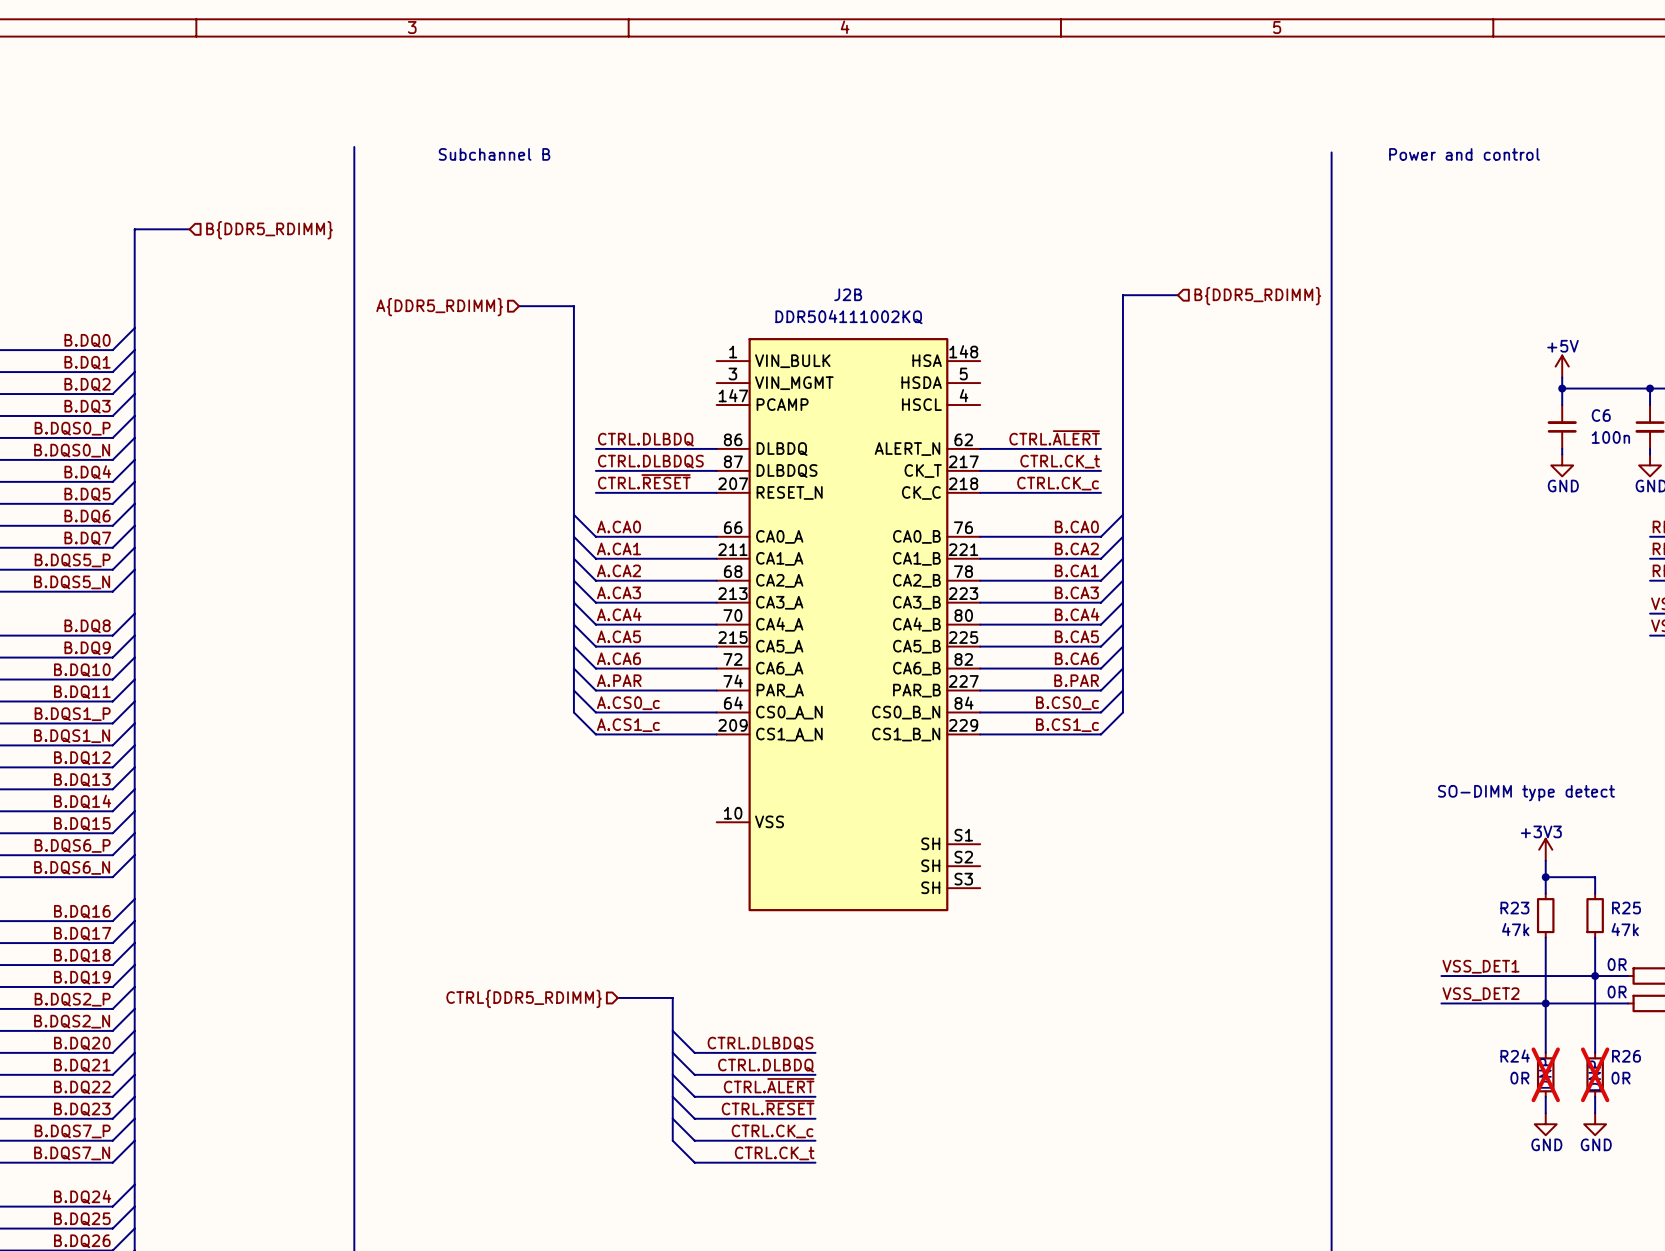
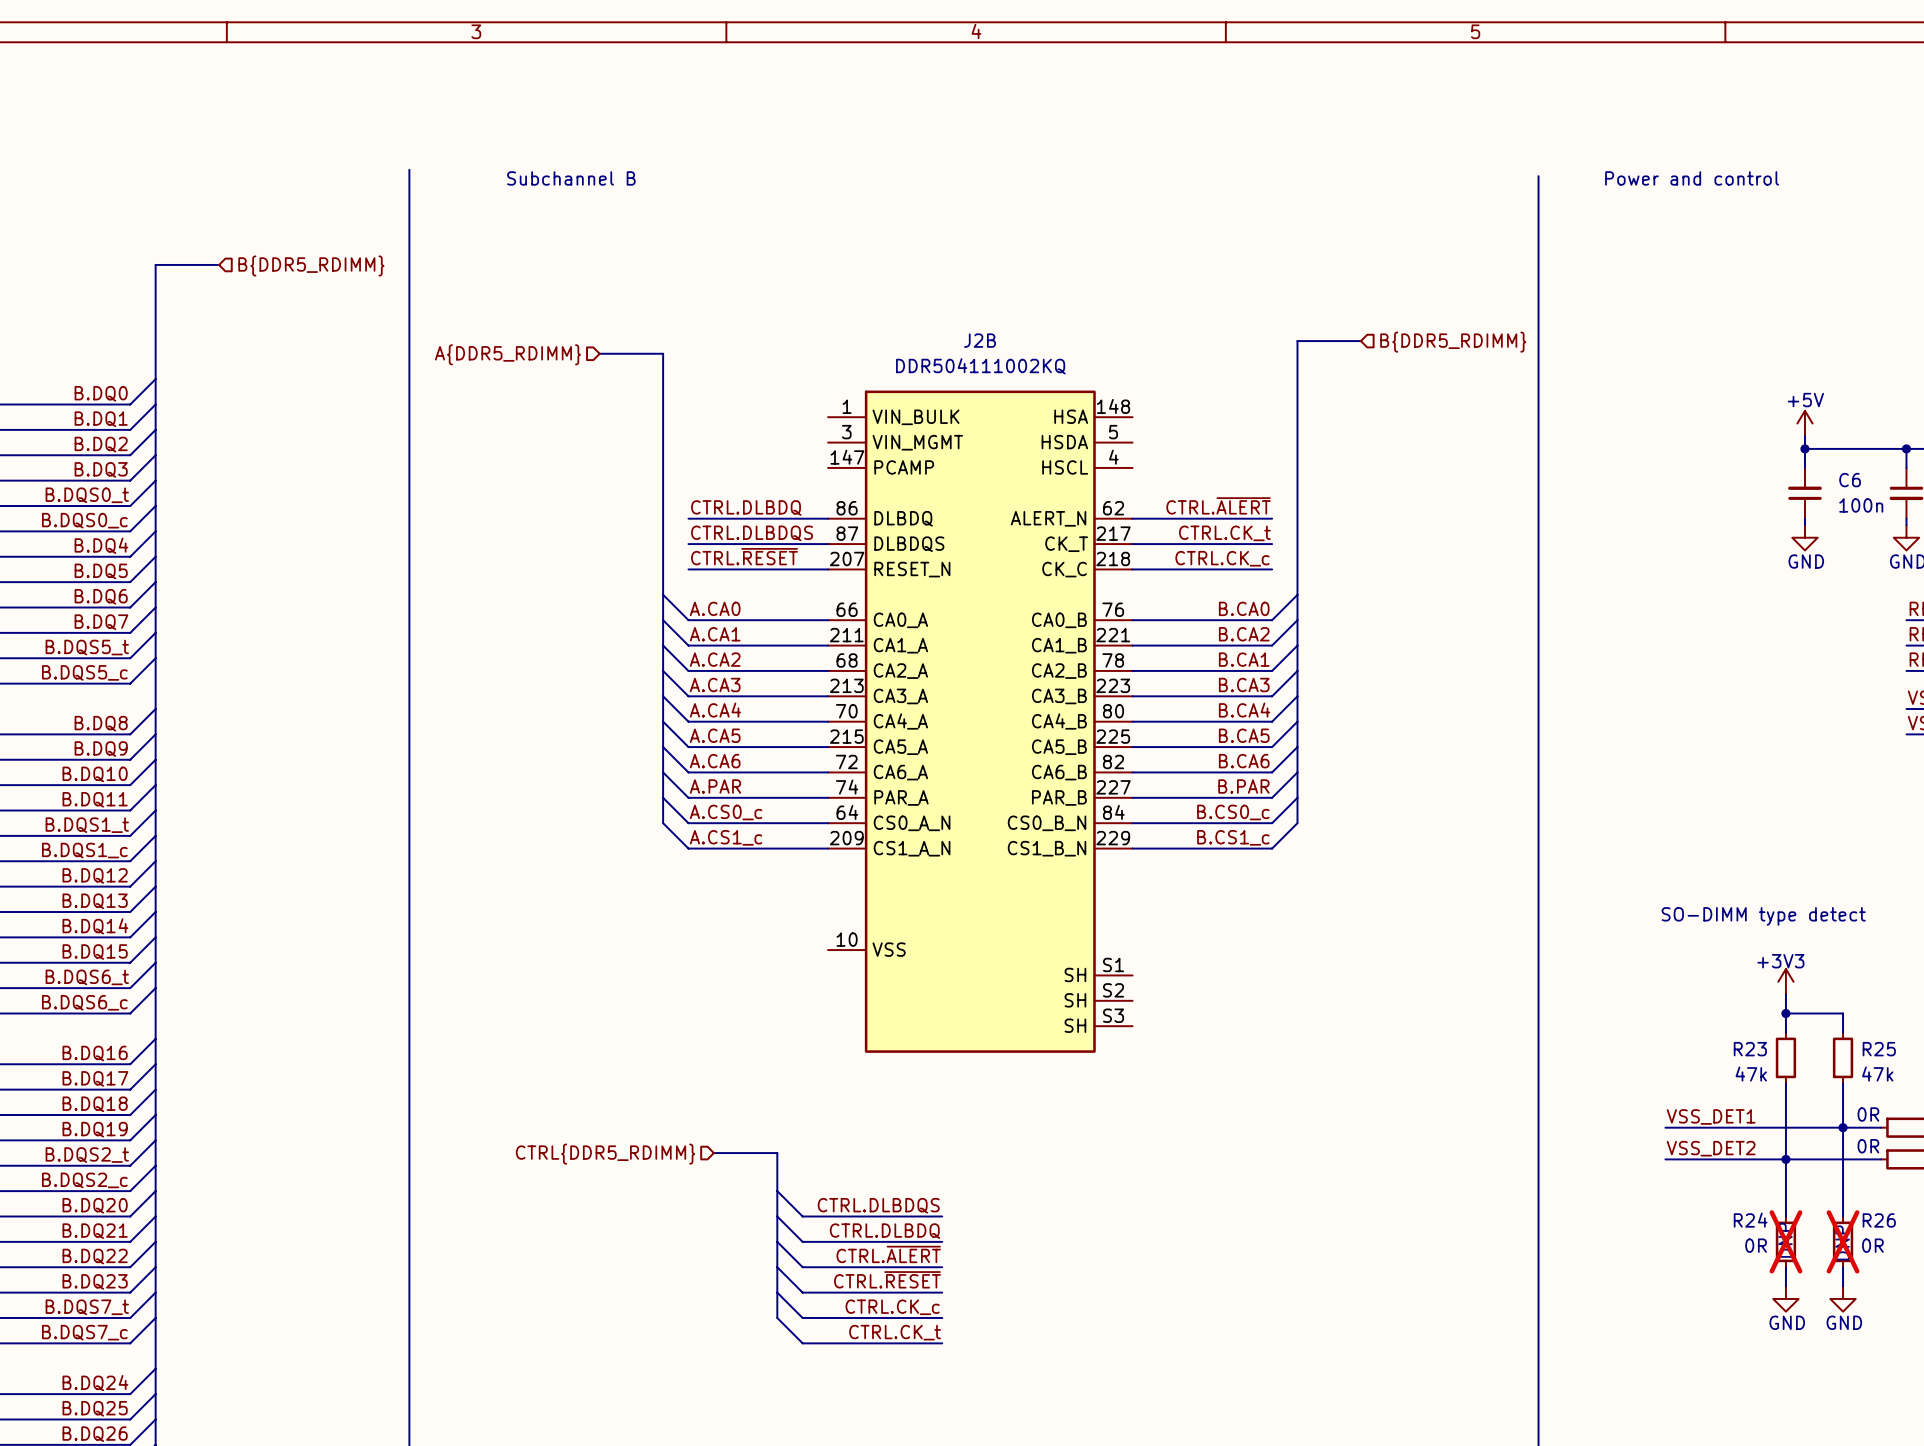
label: B.DQS0_P (72, 428) -> B.DQS0_t (87, 495)
label: B.DQS0_N (72, 450) -> B.DQS0_c (84, 520)
label: B.DQS5_P (72, 560) -> B.DQS5_t (87, 647)
label: B.DQS5_N (72, 582) -> B.DQS5_c (84, 672)
label: B.DQS1_P (72, 714) -> B.DQS1_t (87, 825)
label: B.DQS1_N (72, 736) -> B.DQS1_c (84, 850)
label: B.DQS6_P (72, 845) -> B.DQS6_t (87, 977)
label: B.DQS6_N (72, 867) -> B.DQS6_c (84, 1002)
label: B.DQS2_P (72, 999) -> B.DQS2_t (87, 1155)
label: B.DQS2_N (72, 1021) -> B.DQS2_c (84, 1180)
label: B.DQS7_P (72, 1131) -> B.DQS7_t (87, 1307)
label: B.DQS7_N (72, 1153) -> B.DQS7_c (84, 1332)

